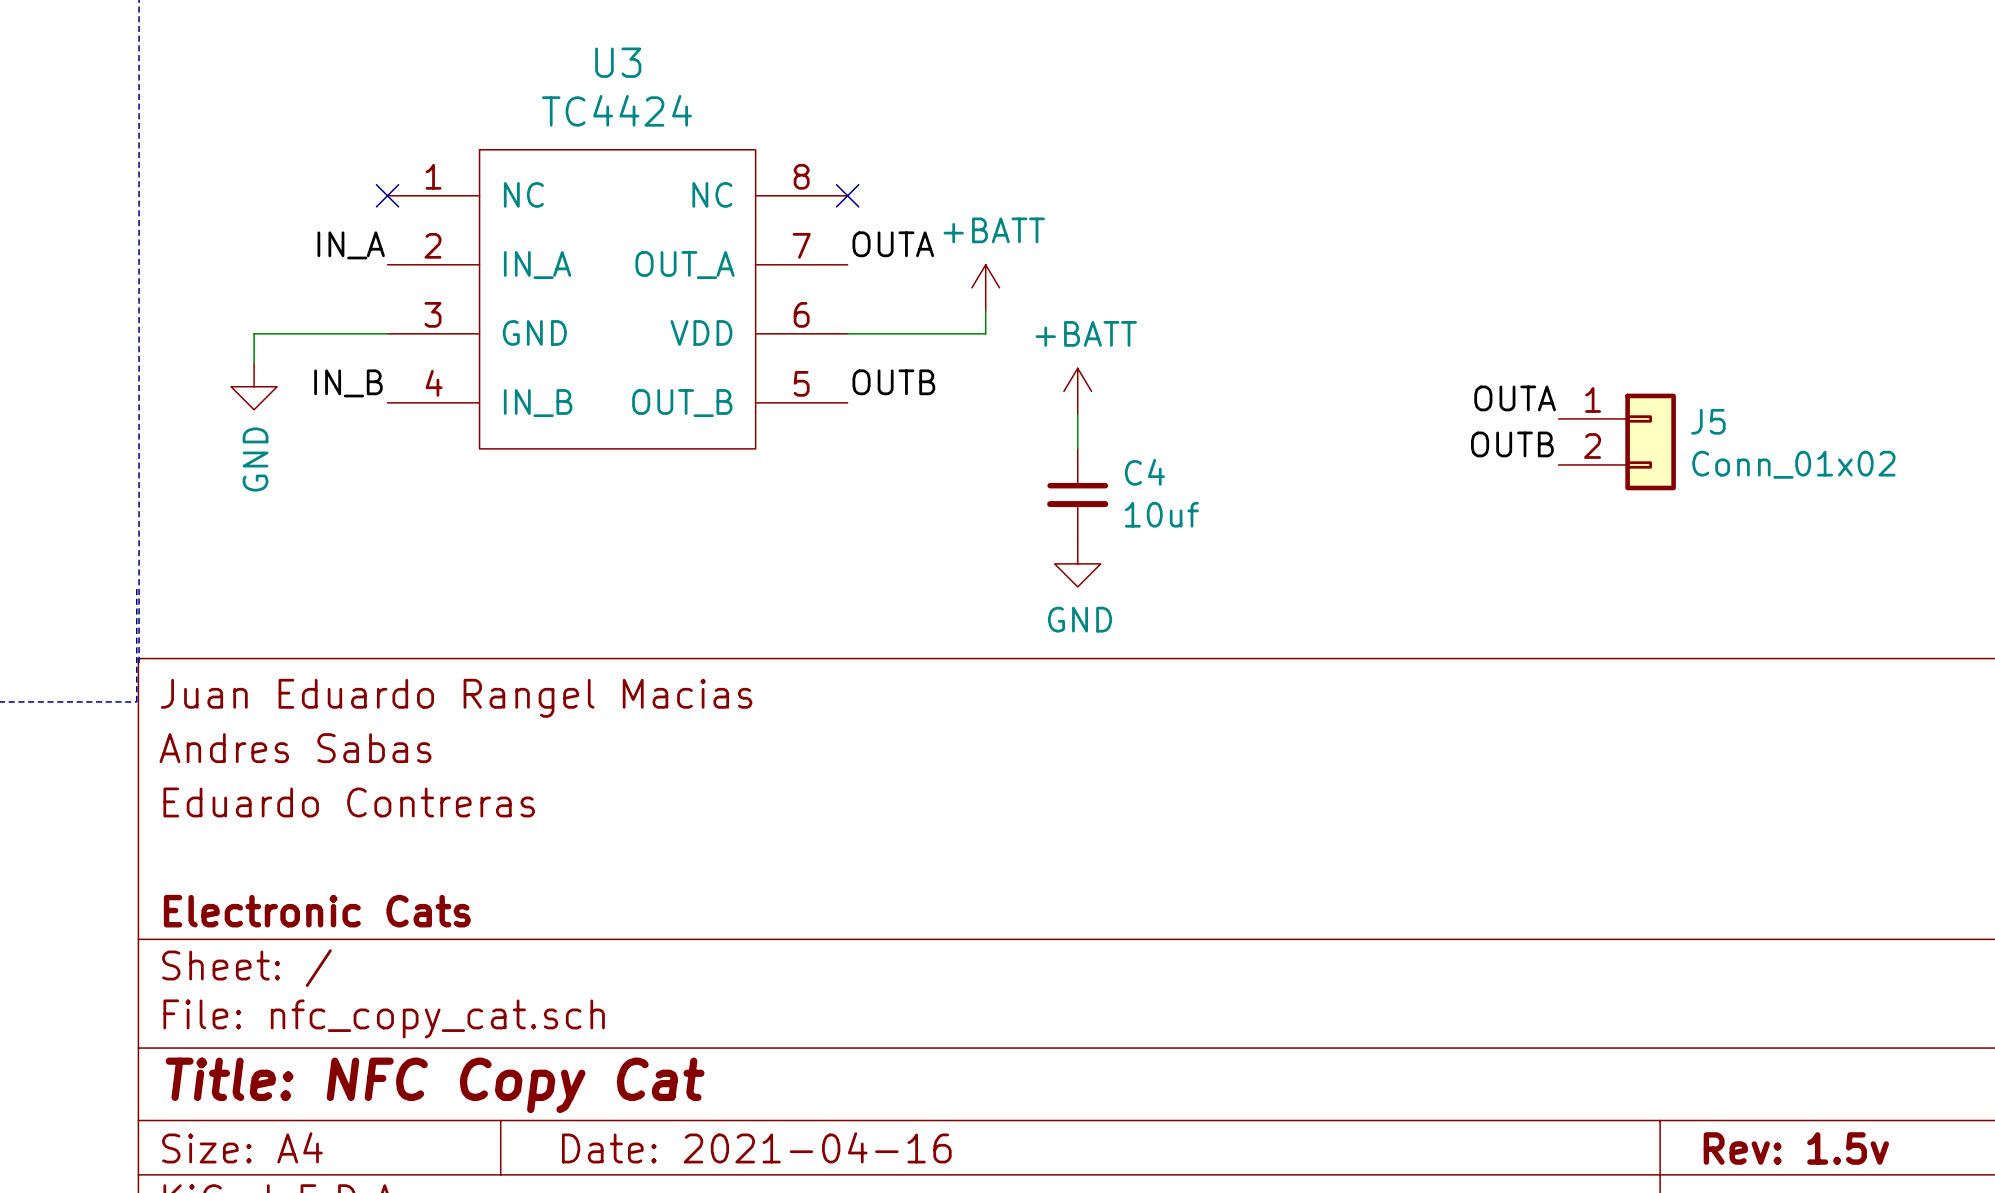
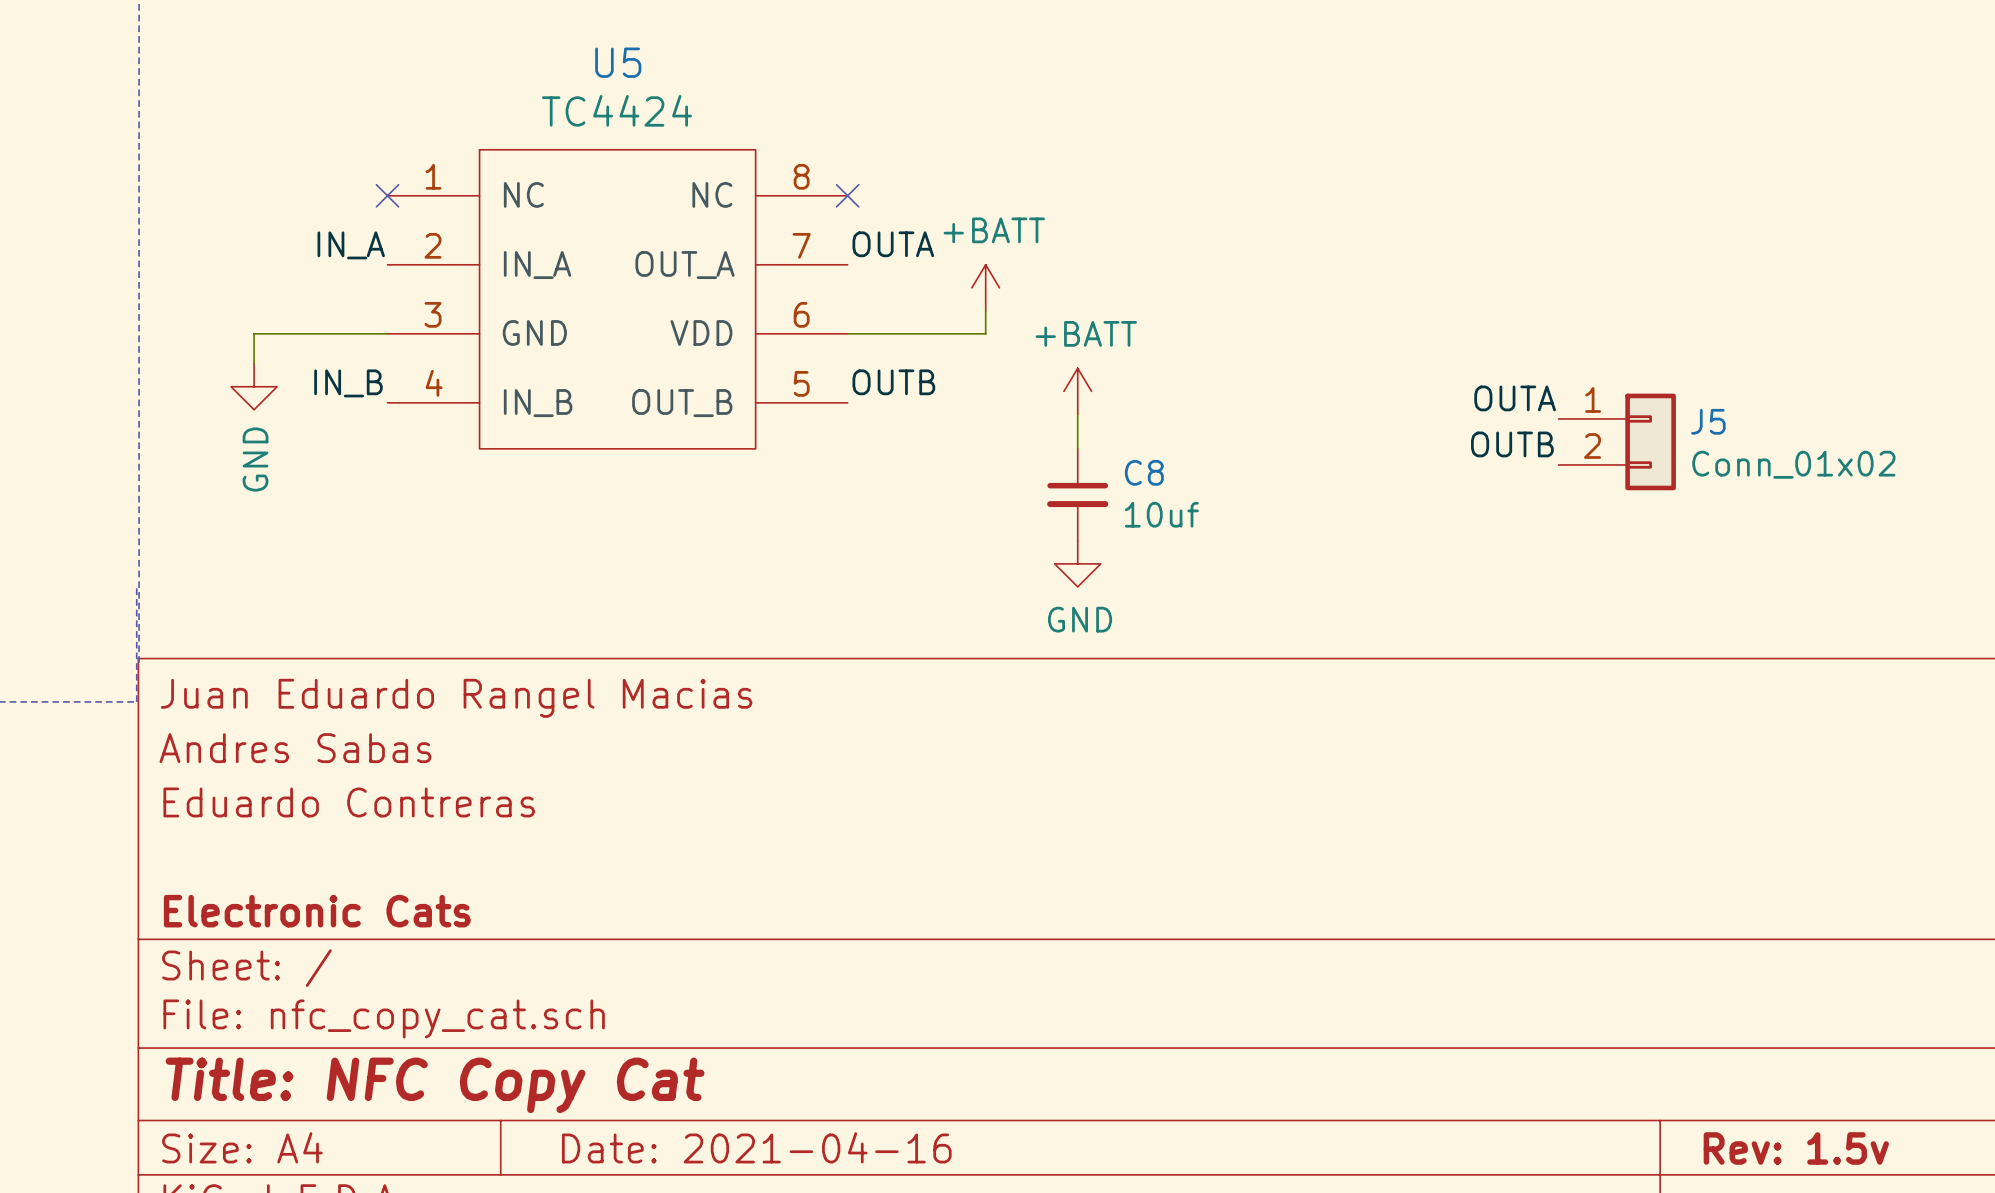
U3 name: U3 (618, 62) -> U5 (618, 62)
C4 name: C4 (1144, 472) -> C8 (1144, 472)

